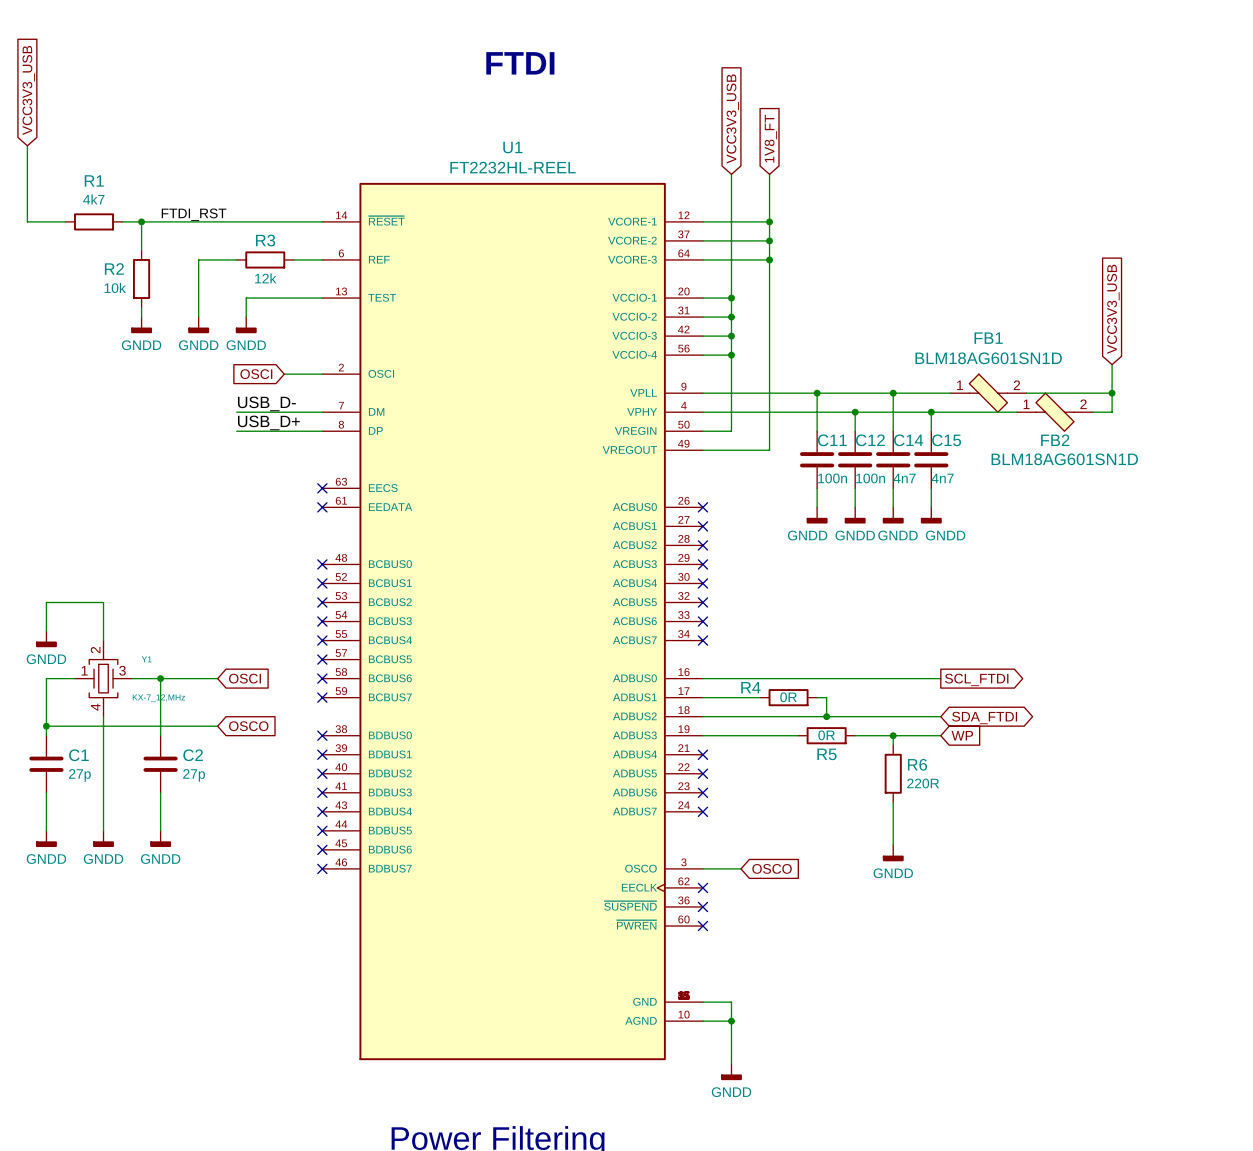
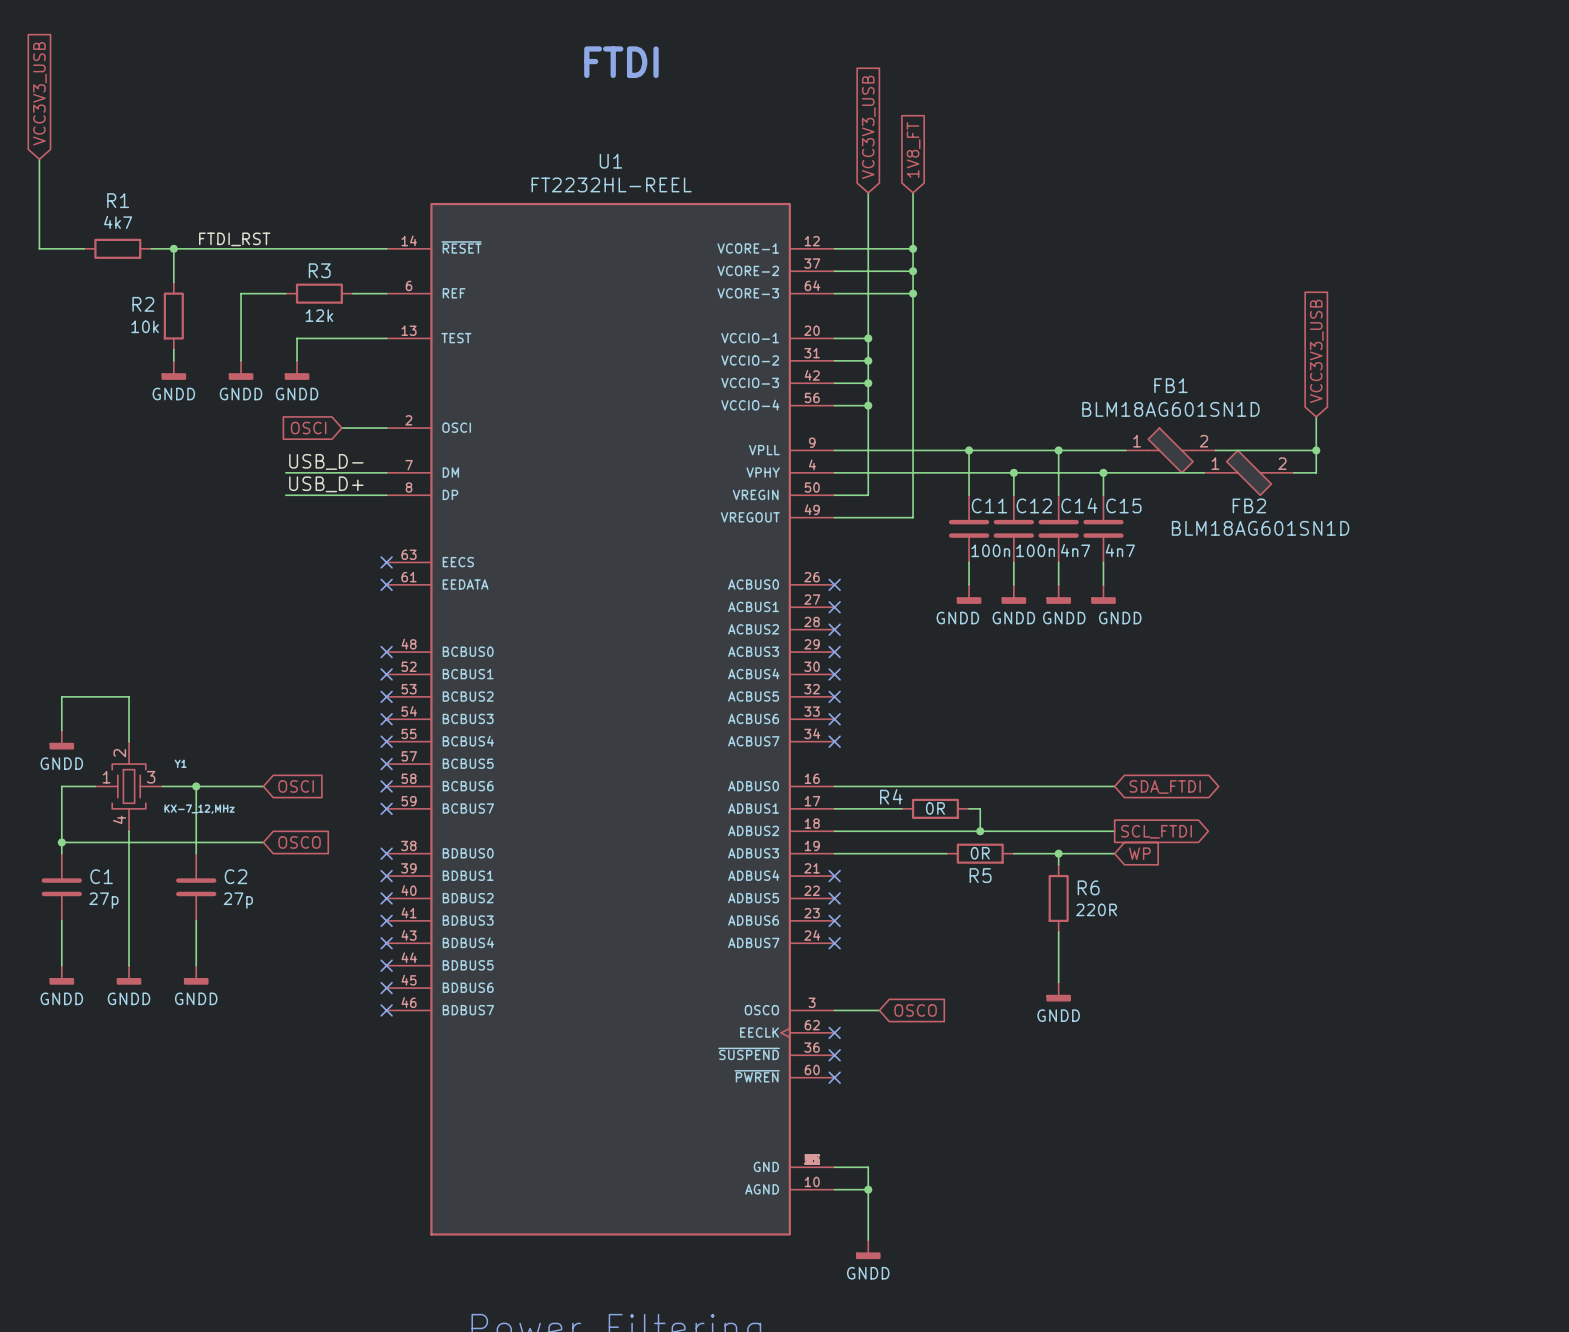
global label shape: output (976, 679) -> bidirectional (1165, 787)
global label: SCL_FTDI (976, 679) -> SDA_FTDI (1165, 787)
global label shape: bidirectional (984, 717) -> output (1156, 831)
global label: SDA_FTDI (984, 717) -> SCL_FTDI (1156, 831)

